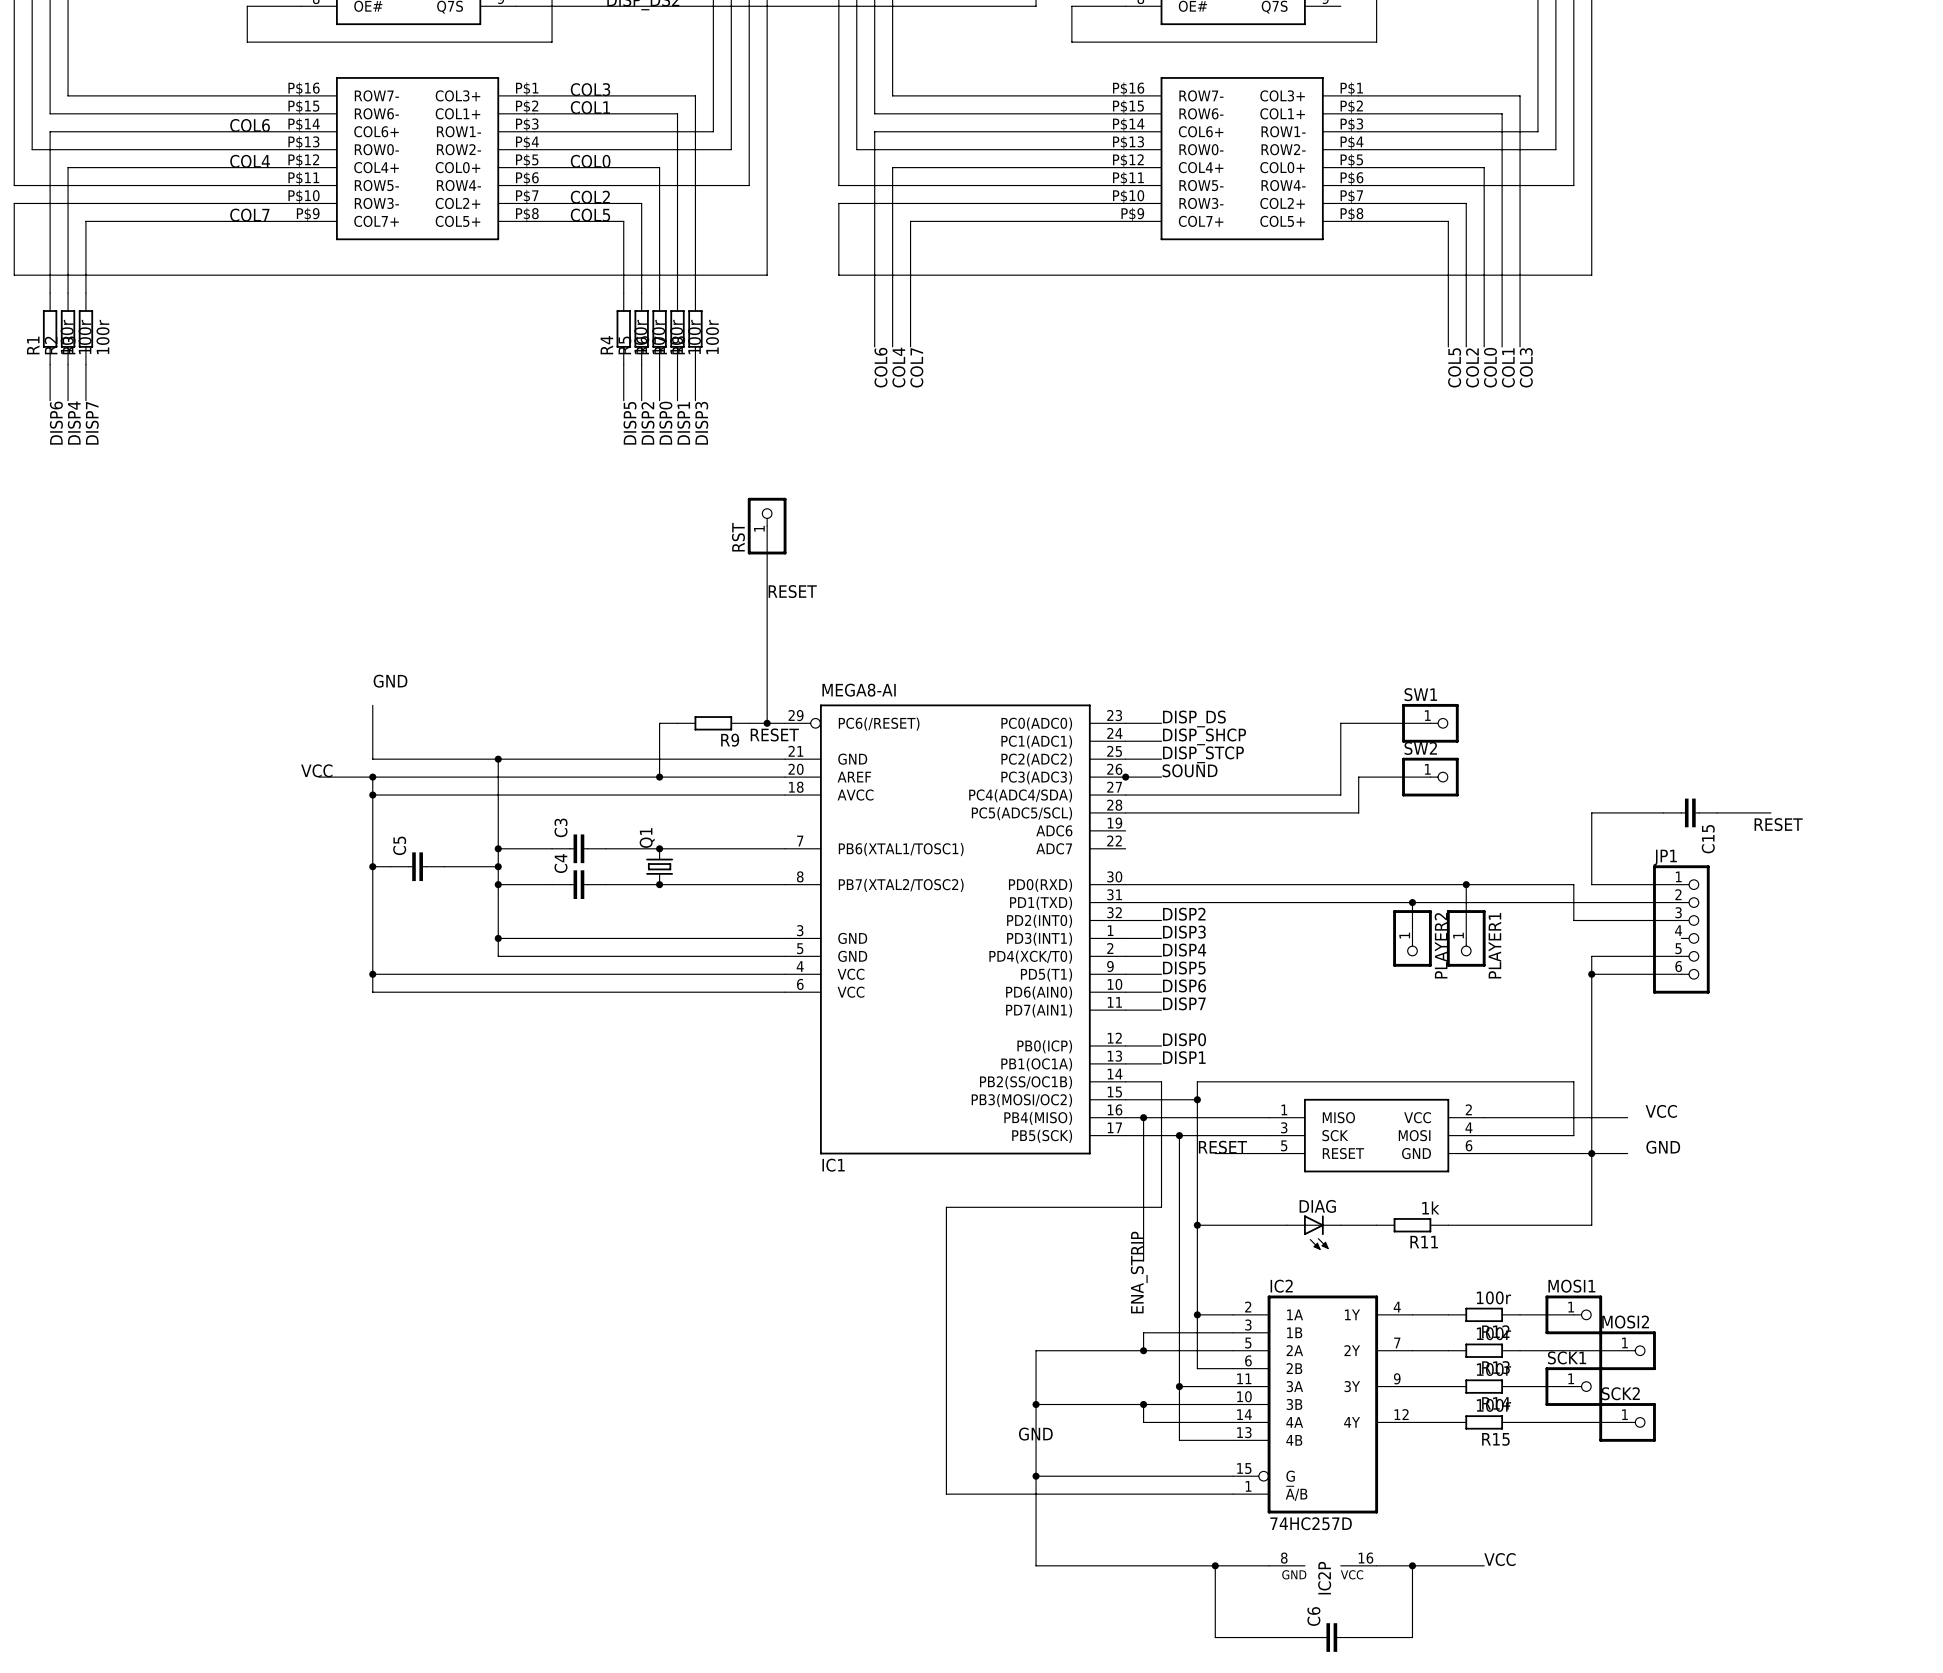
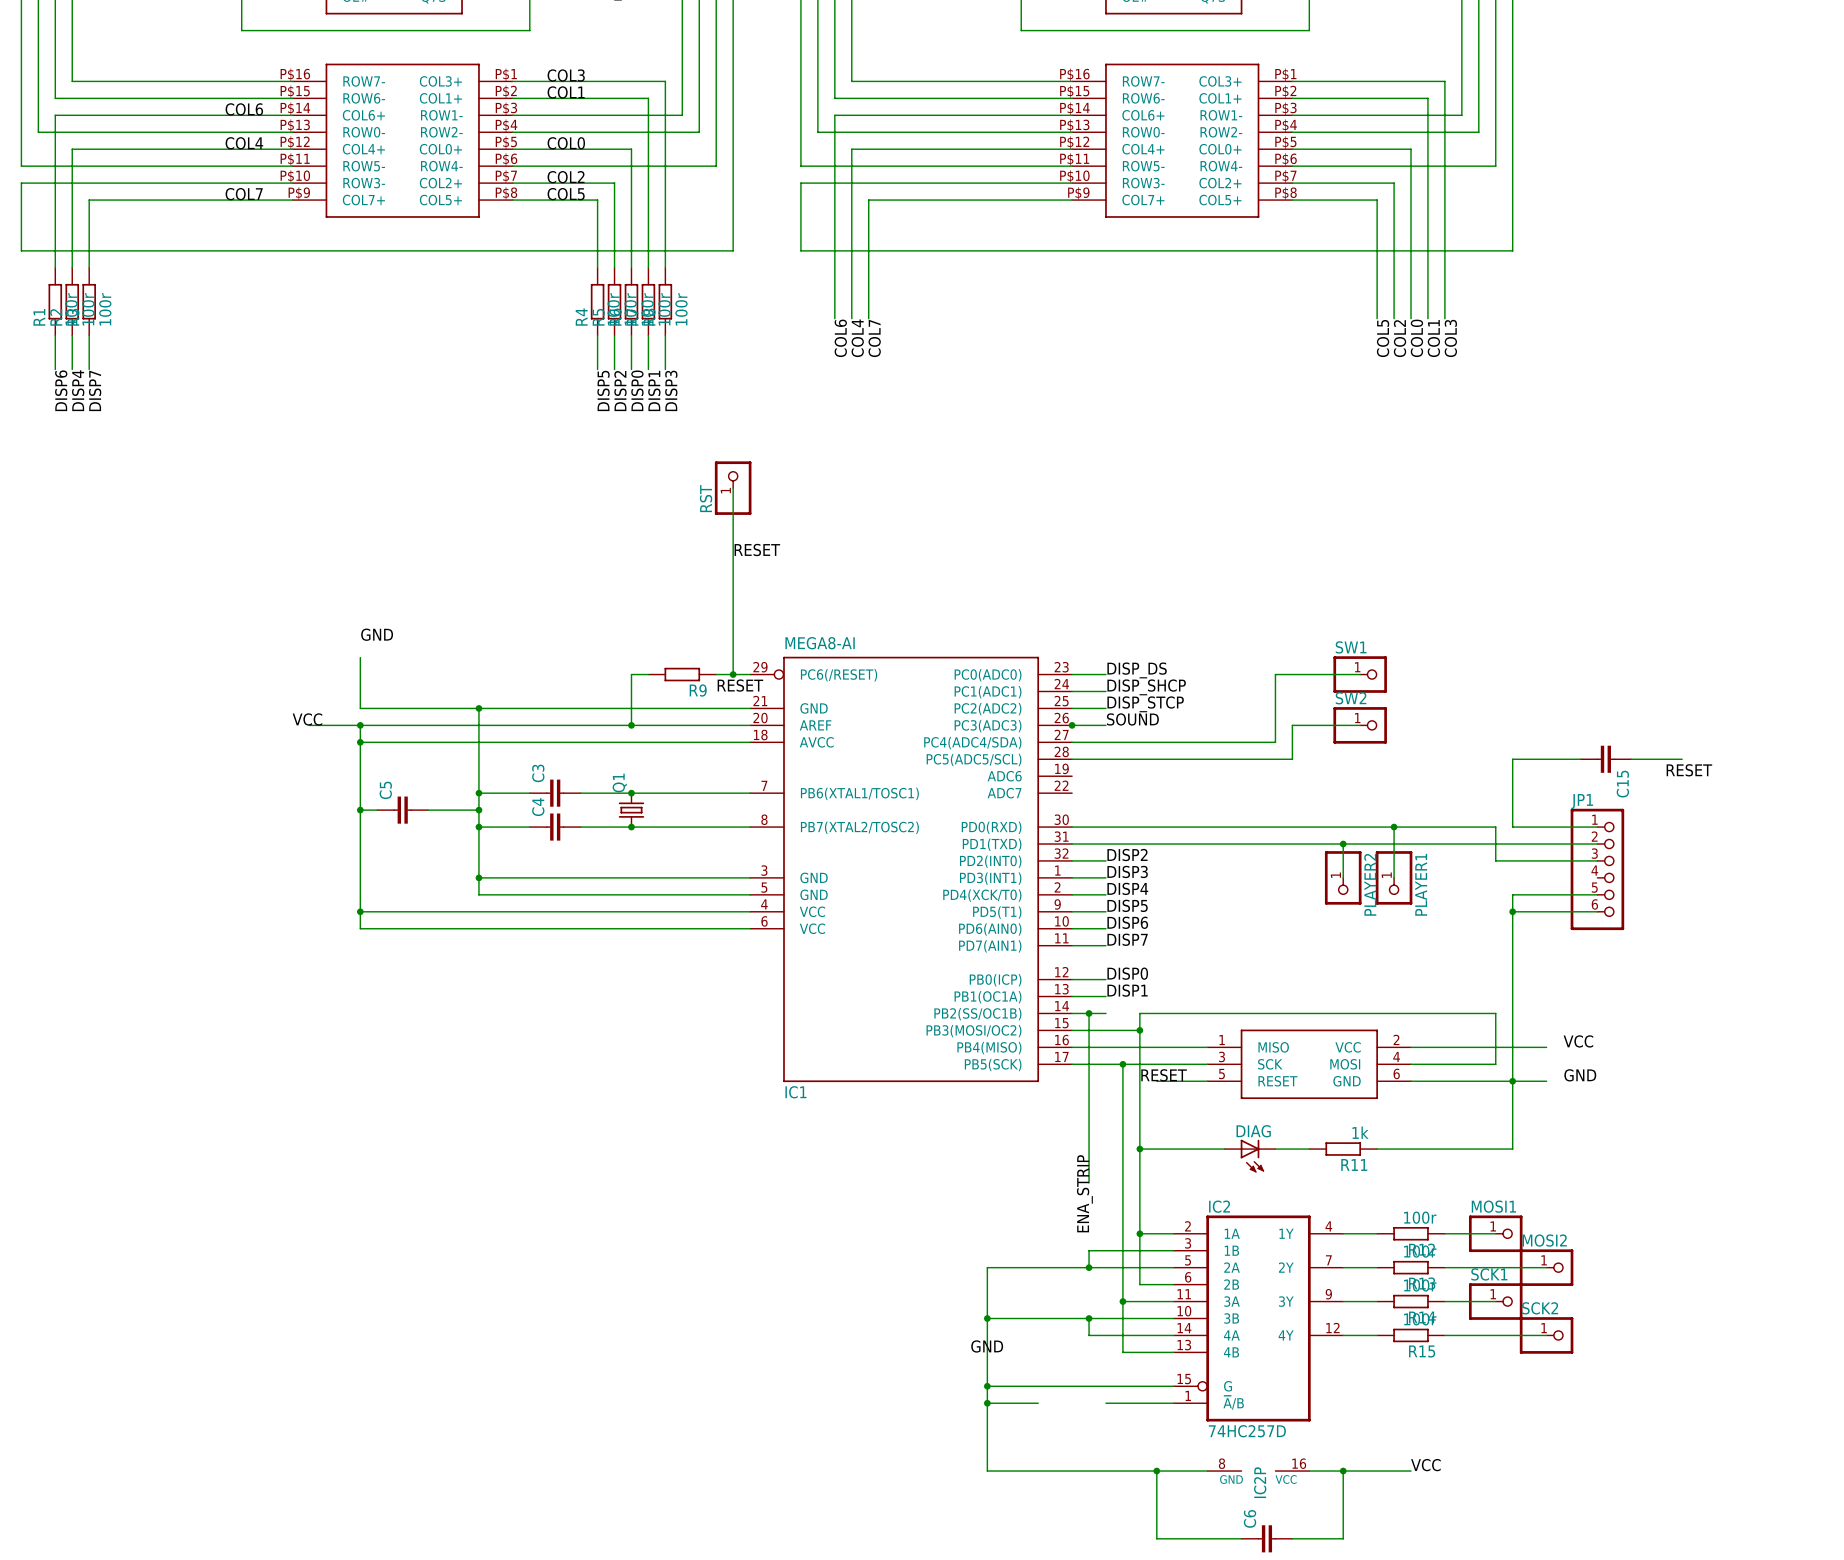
wire: none -> (1089, 1013) (1089, 1047)
wire: (1161, 1081) (1161, 1207) (946, 1207) (946, 1494) (1036, 1494) -> none
junction position: (1143, 1117) -> (1089, 1013)
junction: none -> (987, 1403)
wire: (1089, 1494) (1161, 1494) -> none

